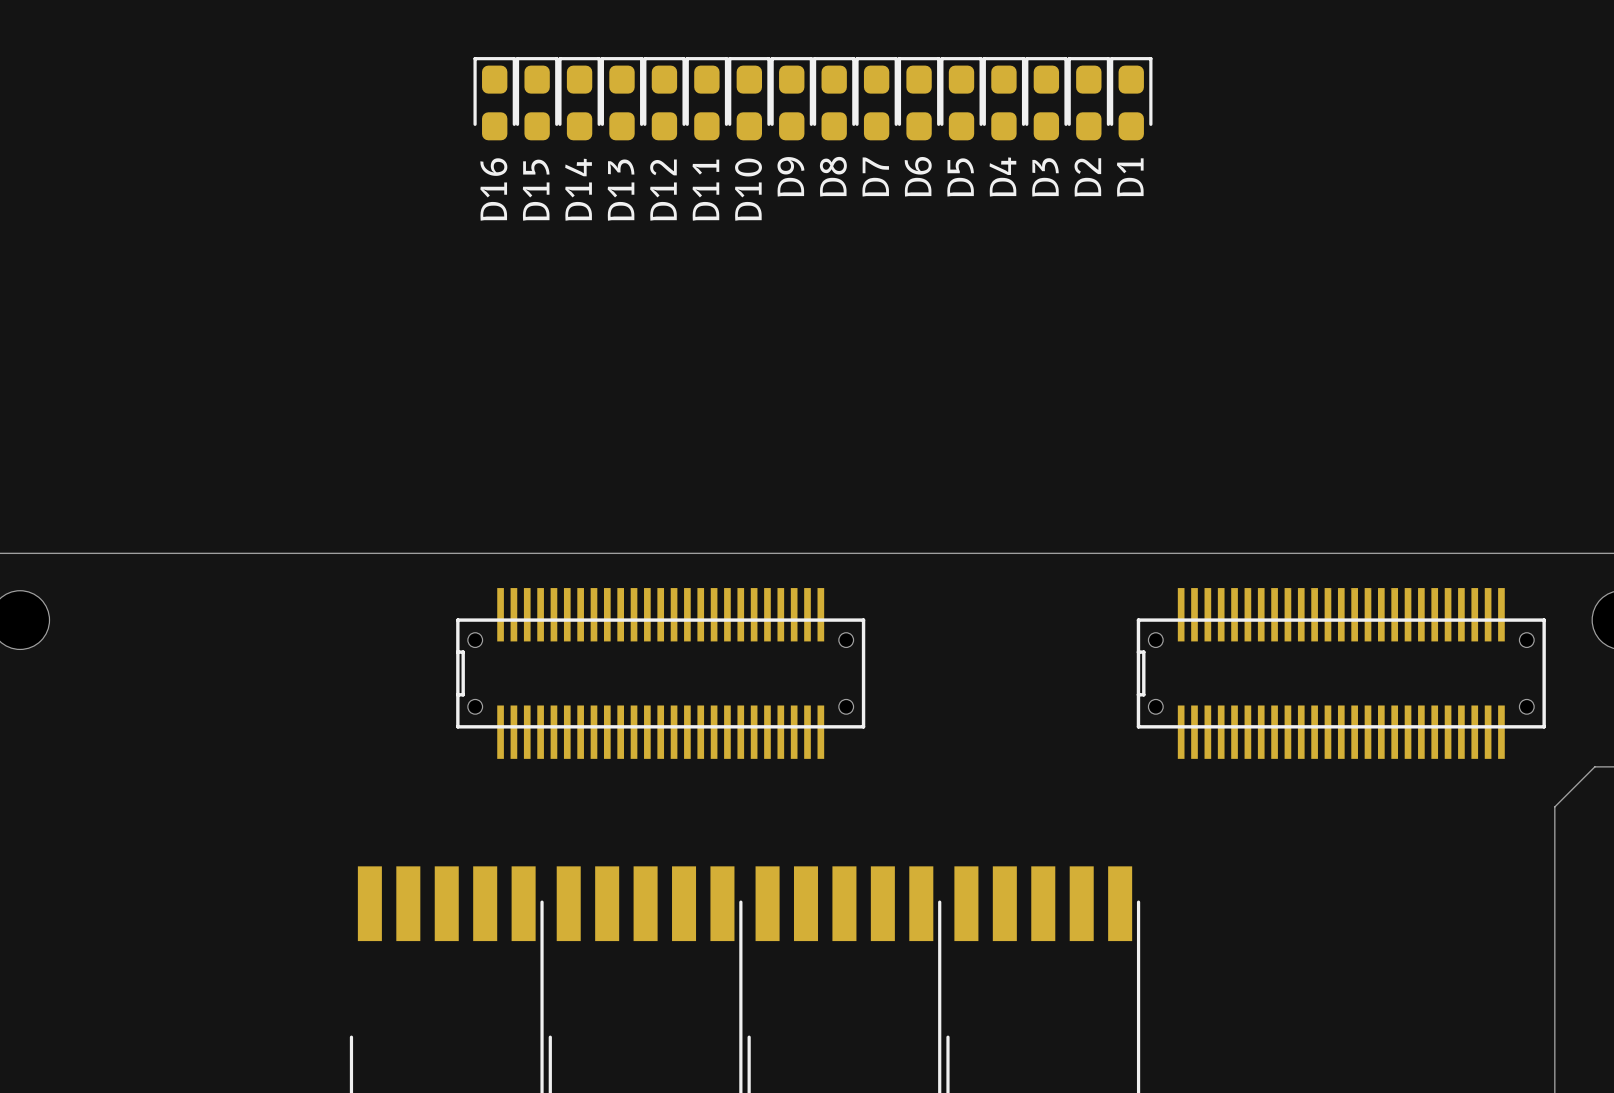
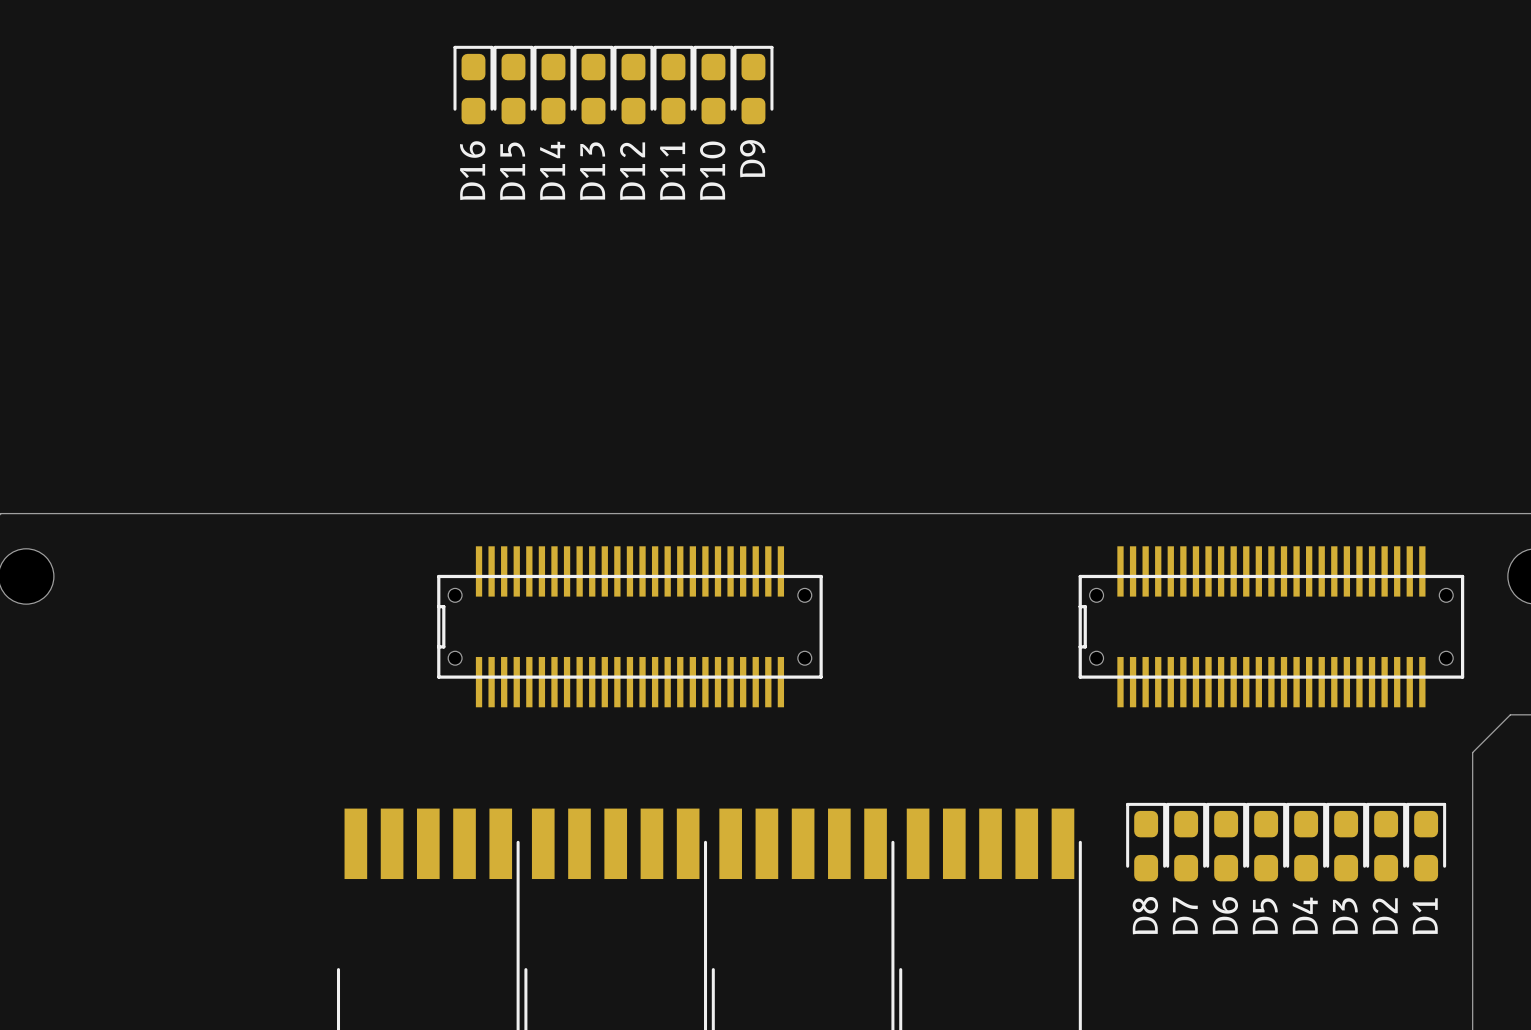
D8 position: (834, 98) -> (1146, 842)
D7 position: (876, 98) -> (1186, 842)
D6 position: (919, 98) -> (1226, 842)
D5 position: (961, 98) -> (1266, 842)
D4 position: (1003, 98) -> (1306, 842)
D3 position: (1046, 98) -> (1346, 842)
D2 position: (1088, 98) -> (1386, 842)
D1 position: (1131, 98) -> (1426, 842)

